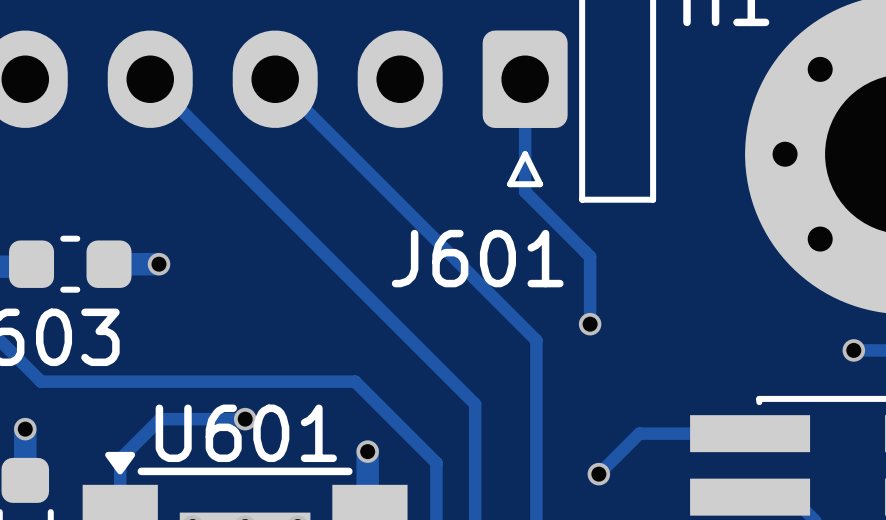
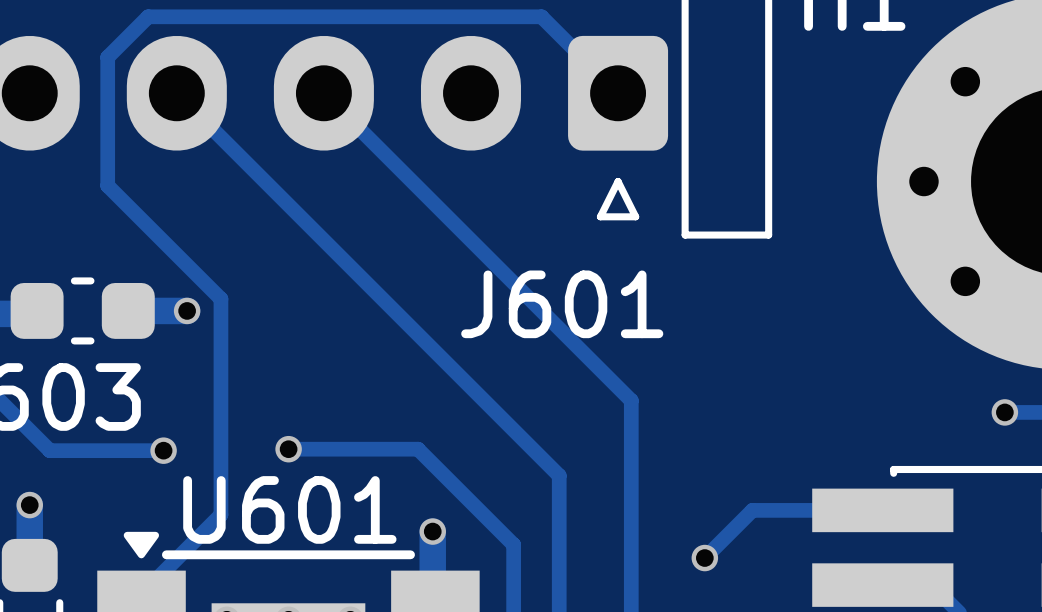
track: (525, 79) (525, 191) (590, 256) (590, 316) -> none
via: (590, 324) -> none
track: (41, 381) (245, 381) -> (48, 449) (163, 450)
via: none -> (163, 450)
track: (245, 419) (160, 419) (120, 459) (120, 504) -> (618, 93) (541, 16) (148, 16) (107, 57) (107, 185) (220, 299) (220, 514) (141, 594)
via position: (245, 419) -> (288, 449)

